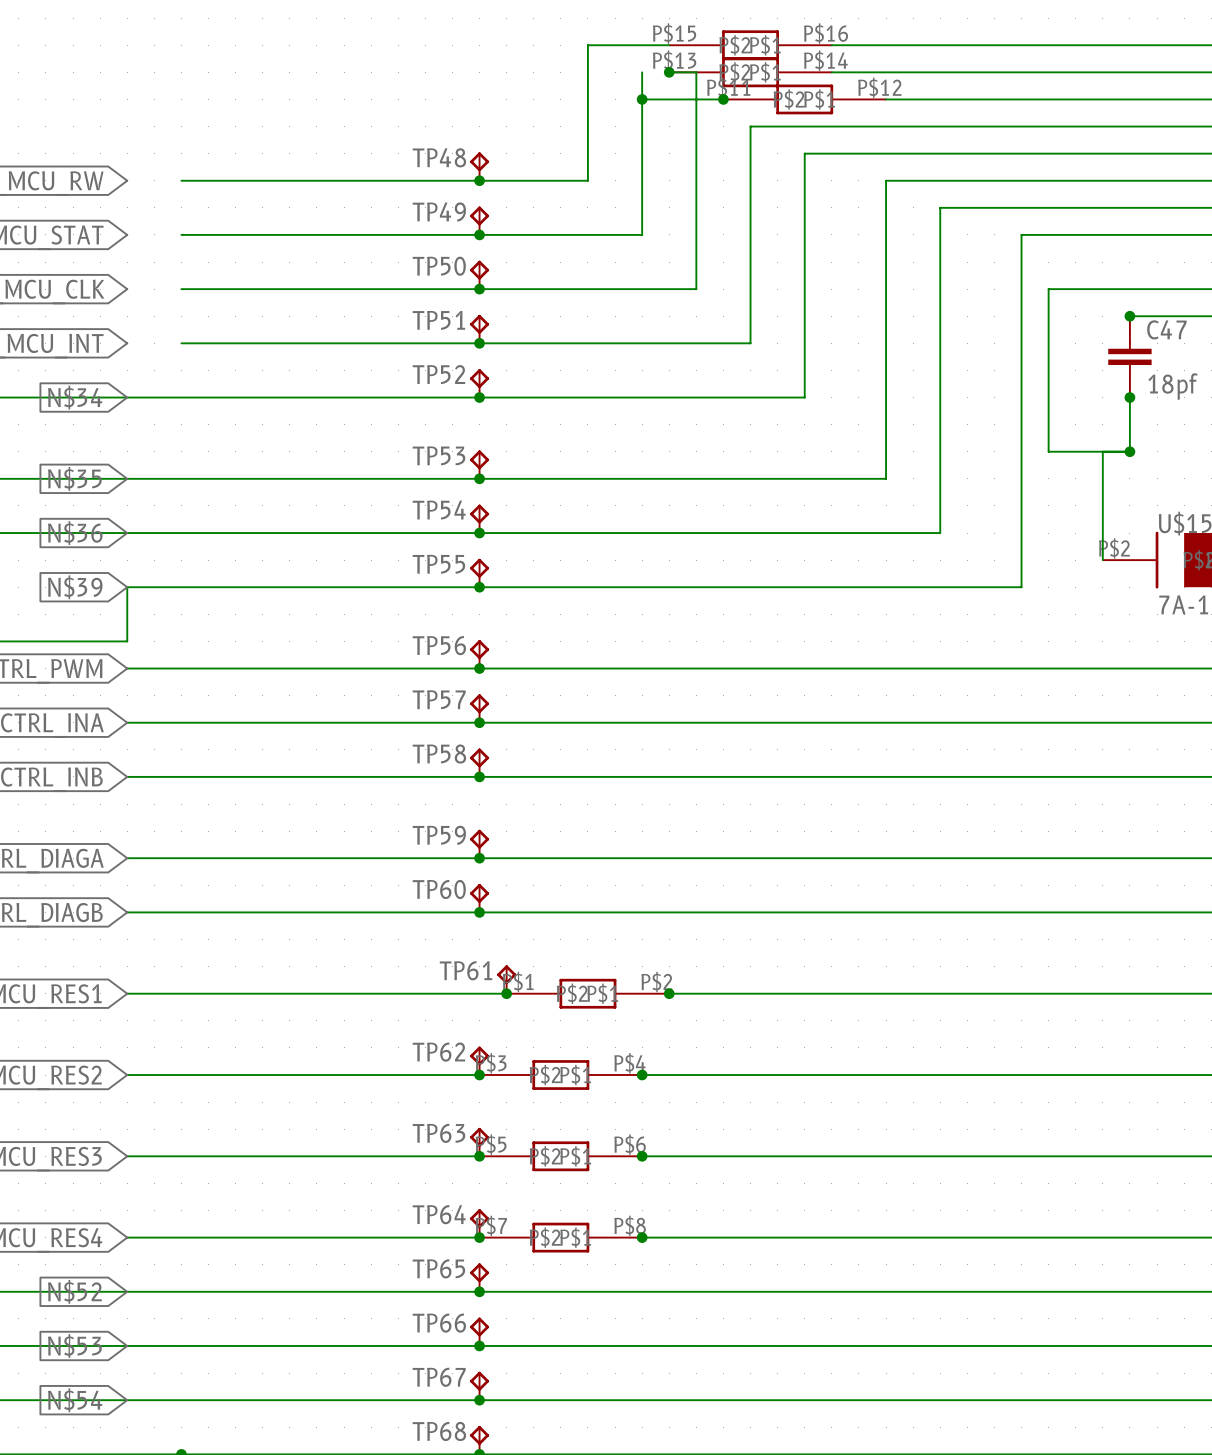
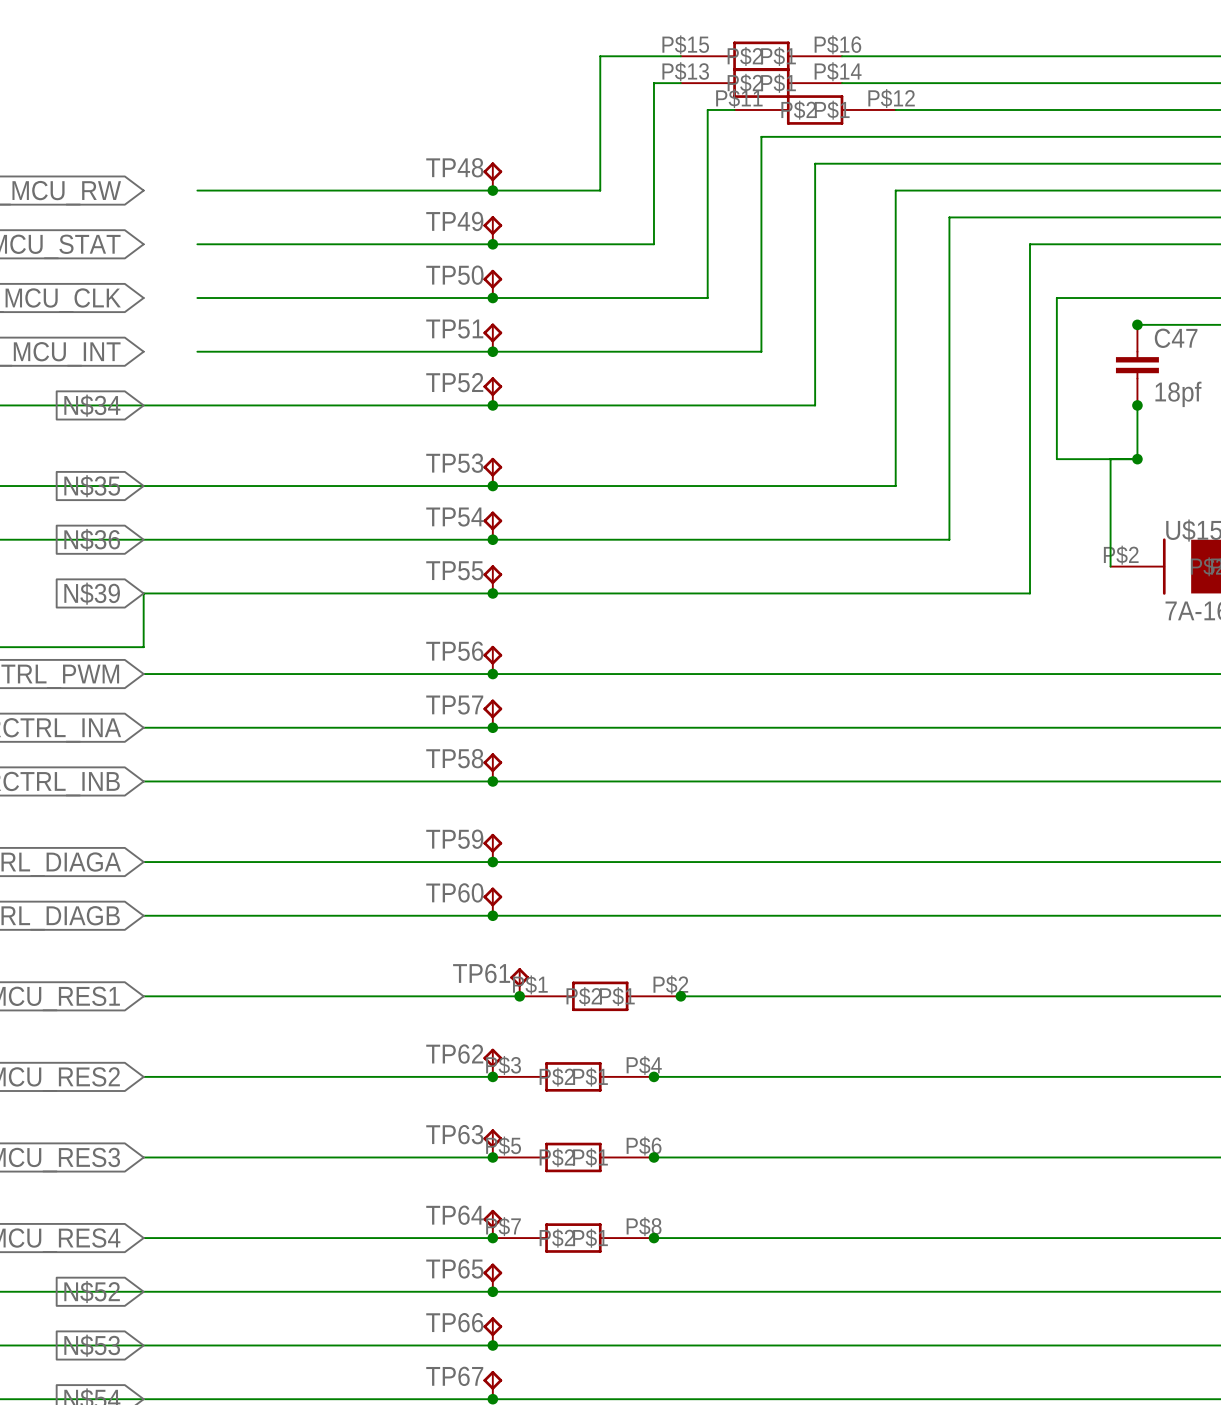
wire: (669, 72) (696, 72) (696, 99) (642, 99) -> (680, 83) (653, 83)
junction: (669, 72) -> none
junction: (642, 99) -> none
junction: (723, 99) -> none

